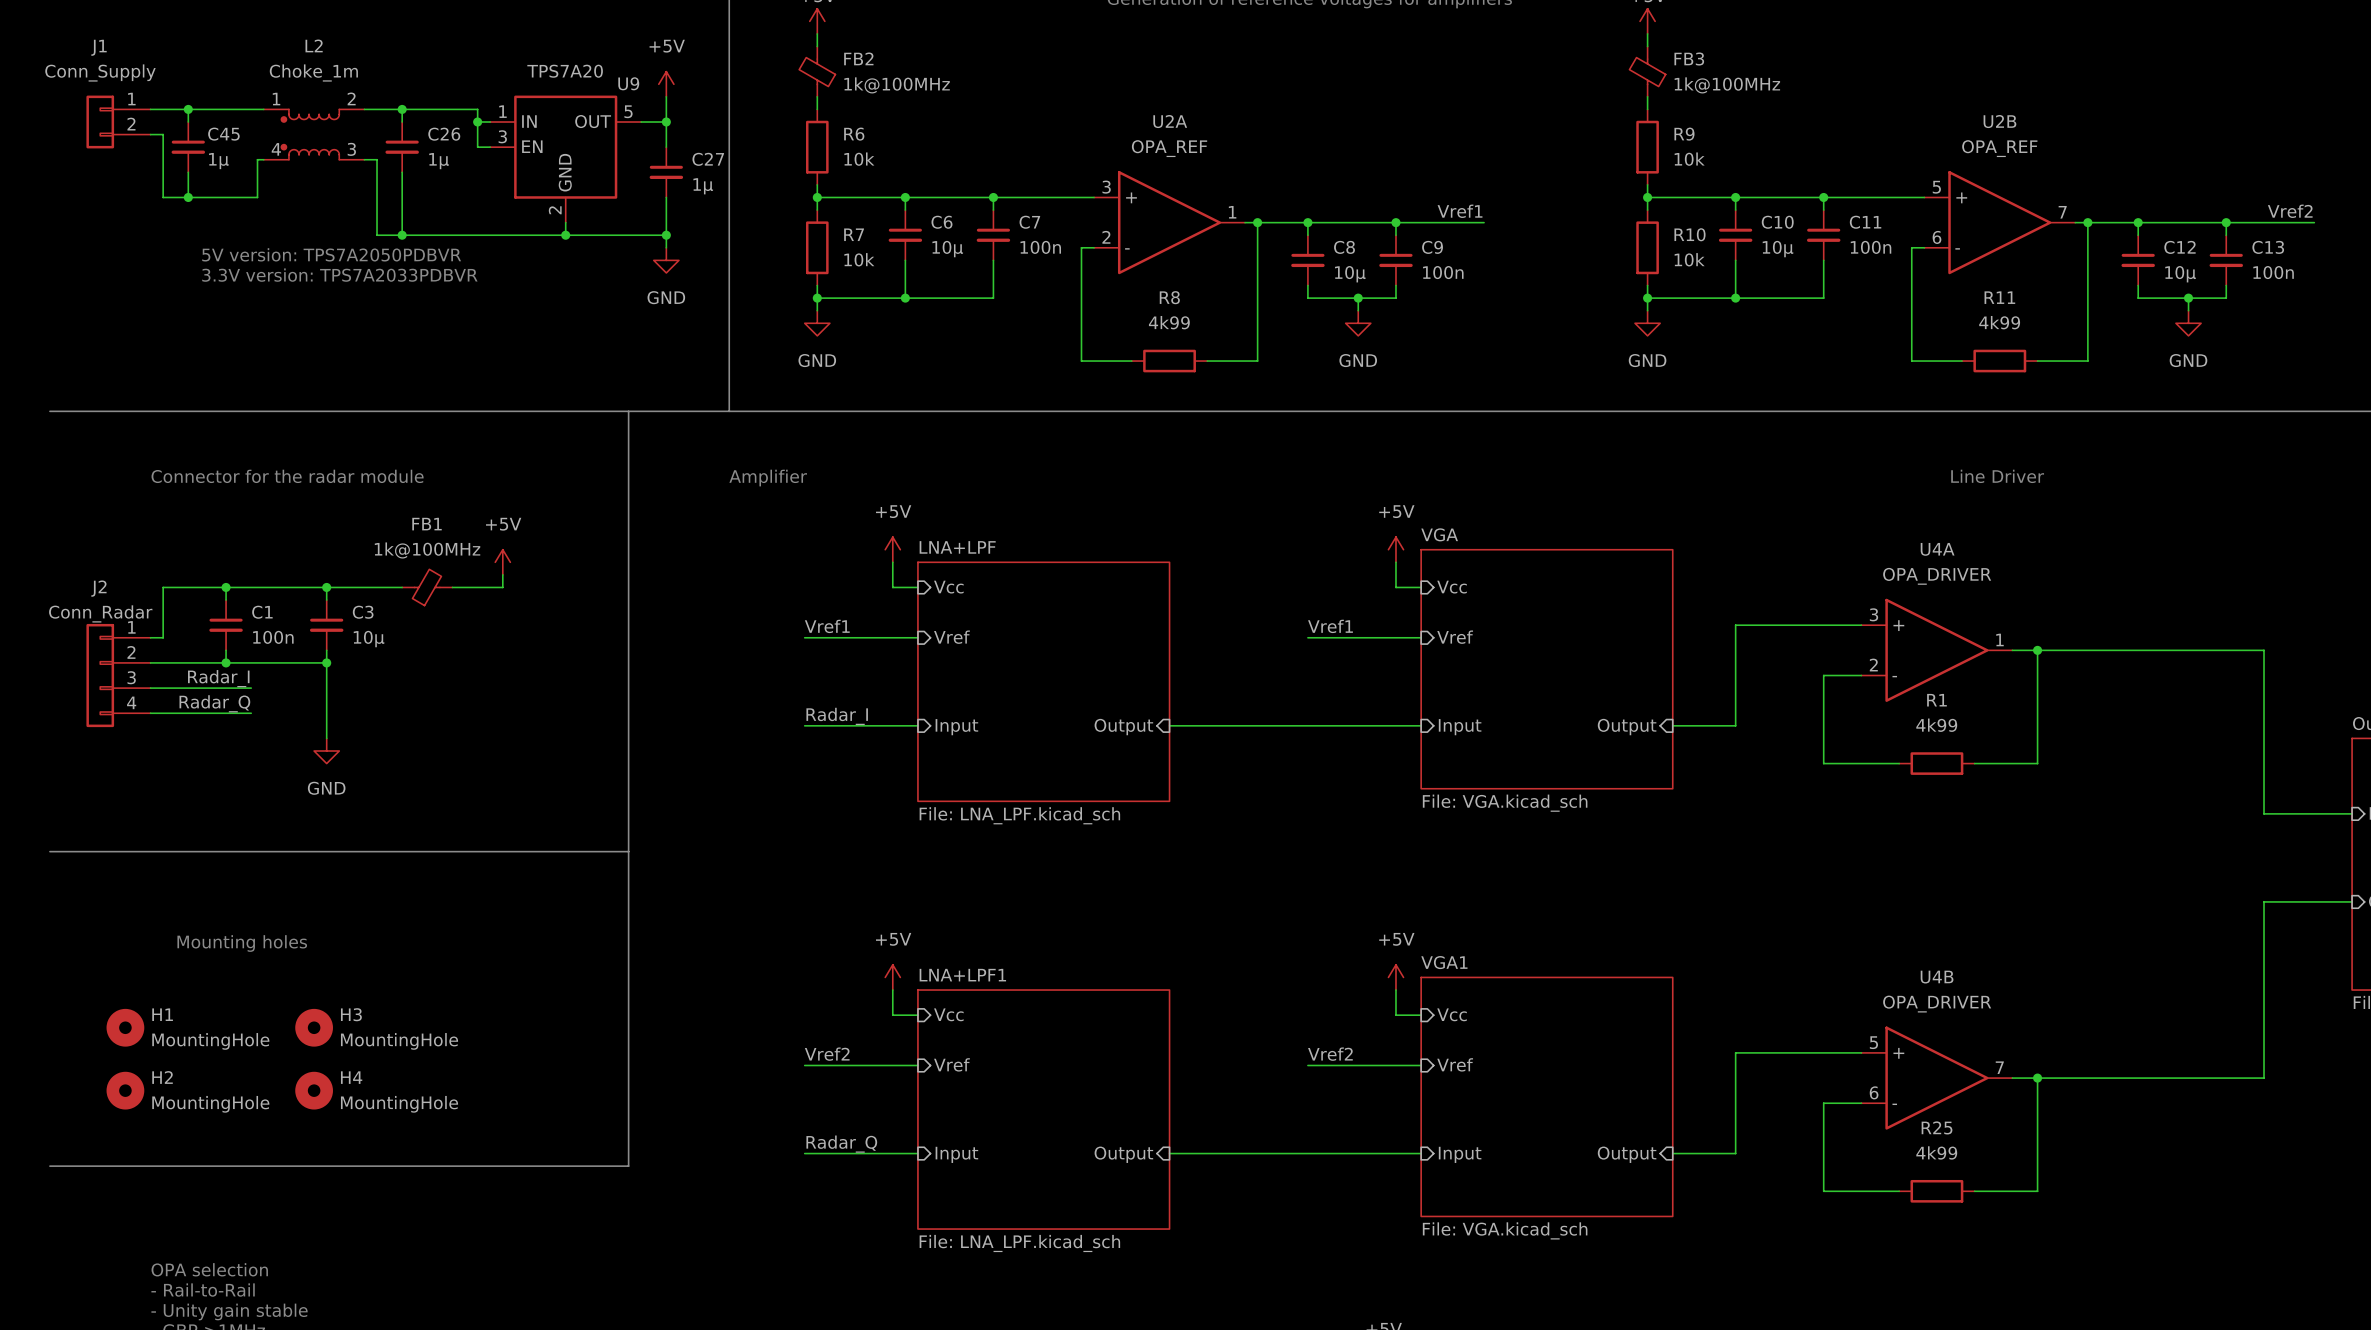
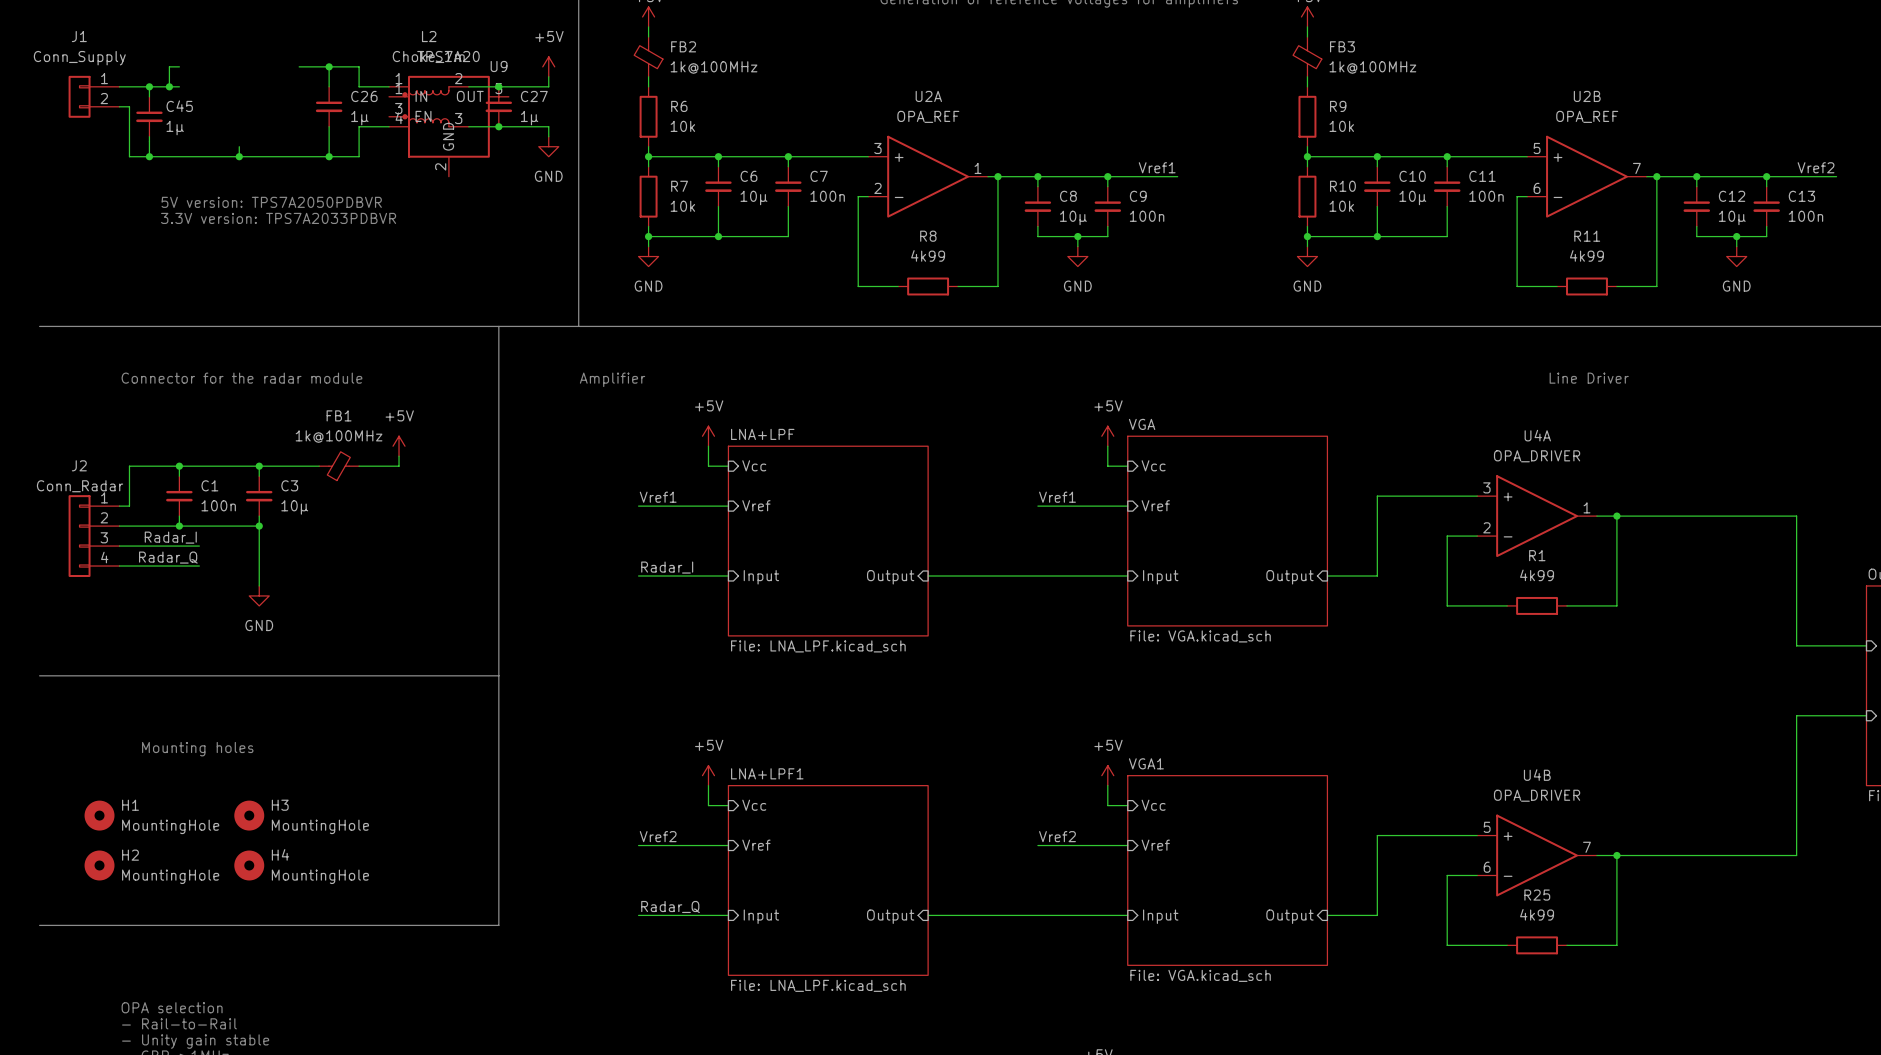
wire: none -> (179, 66) (169, 66) (169, 86)
wire: none -> (329, 66) (329, 86)
power symbol position: +5V (666, 84) -> +5V (548, 66)
wire: (666, 96) (666, 147) -> none
wire: none -> (548, 76) (548, 86) (468, 86)
junction: none -> (169, 86)
wire: (226, 109) (263, 109) -> none
wire: (364, 109) (452, 109) -> (299, 66) (359, 66) (359, 86)
wire: (402, 109) (402, 122) -> (239, 146) (239, 156)
junction position: (402, 109) -> (329, 66)
wire: (477, 109) (477, 147) (490, 147) -> (379, 86) (389, 86)
junction: none -> (498, 86)
wire: (477, 122) (490, 122) -> none
junction: (477, 122) -> none
wire: (641, 122) (666, 122) -> none
junction: (666, 122) -> none
L2 position: (314, 134) -> (428, 106)
C26 position: (402, 147) -> (329, 106)
wire: (263, 159) (257, 159) (257, 197) -> (389, 126) (359, 126) (359, 156) (204, 156)
wire: (364, 159) (377, 159) (377, 235) (666, 235) -> none
wire: none -> (329, 126) (329, 156)
wire: none -> (468, 126) (548, 126) (548, 136)
junction: none -> (498, 126)
wire: (402, 172) (402, 235) -> none
C27 position: (666, 172) -> (498, 106)
junction: none -> (239, 156)
wire: (666, 197) (666, 247) -> none
wire: (565, 222) (565, 235) -> none
junction position: (402, 235) -> (329, 156)
junction: (565, 235) -> none
junction: (666, 235) -> none
power symbol position: GND (666, 260) -> GND (548, 146)

